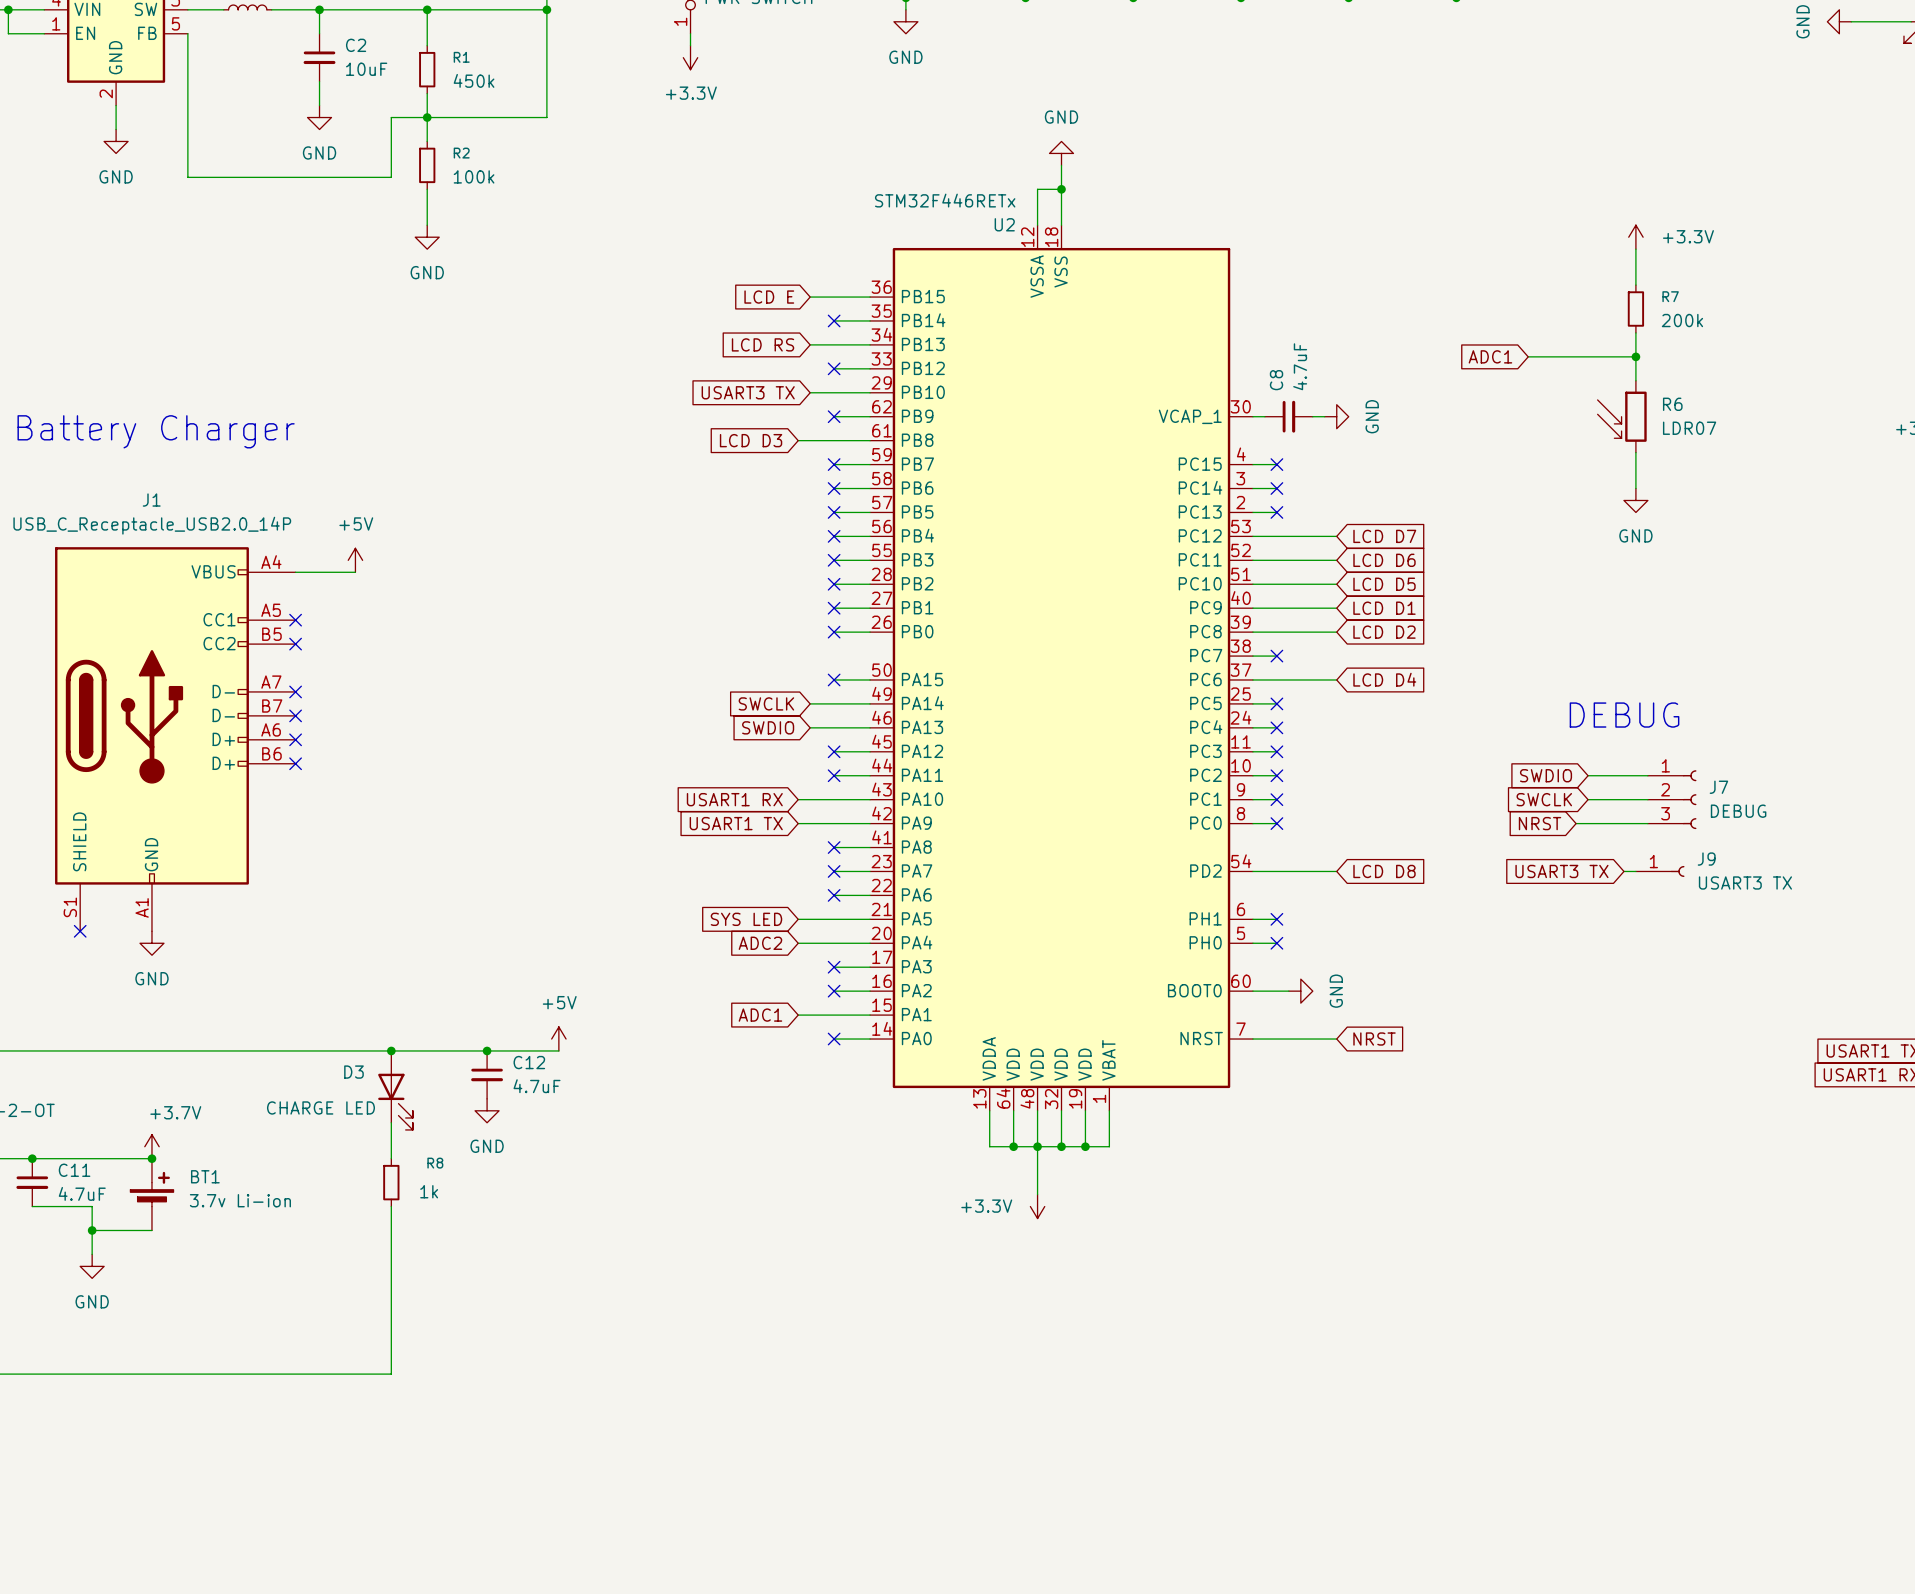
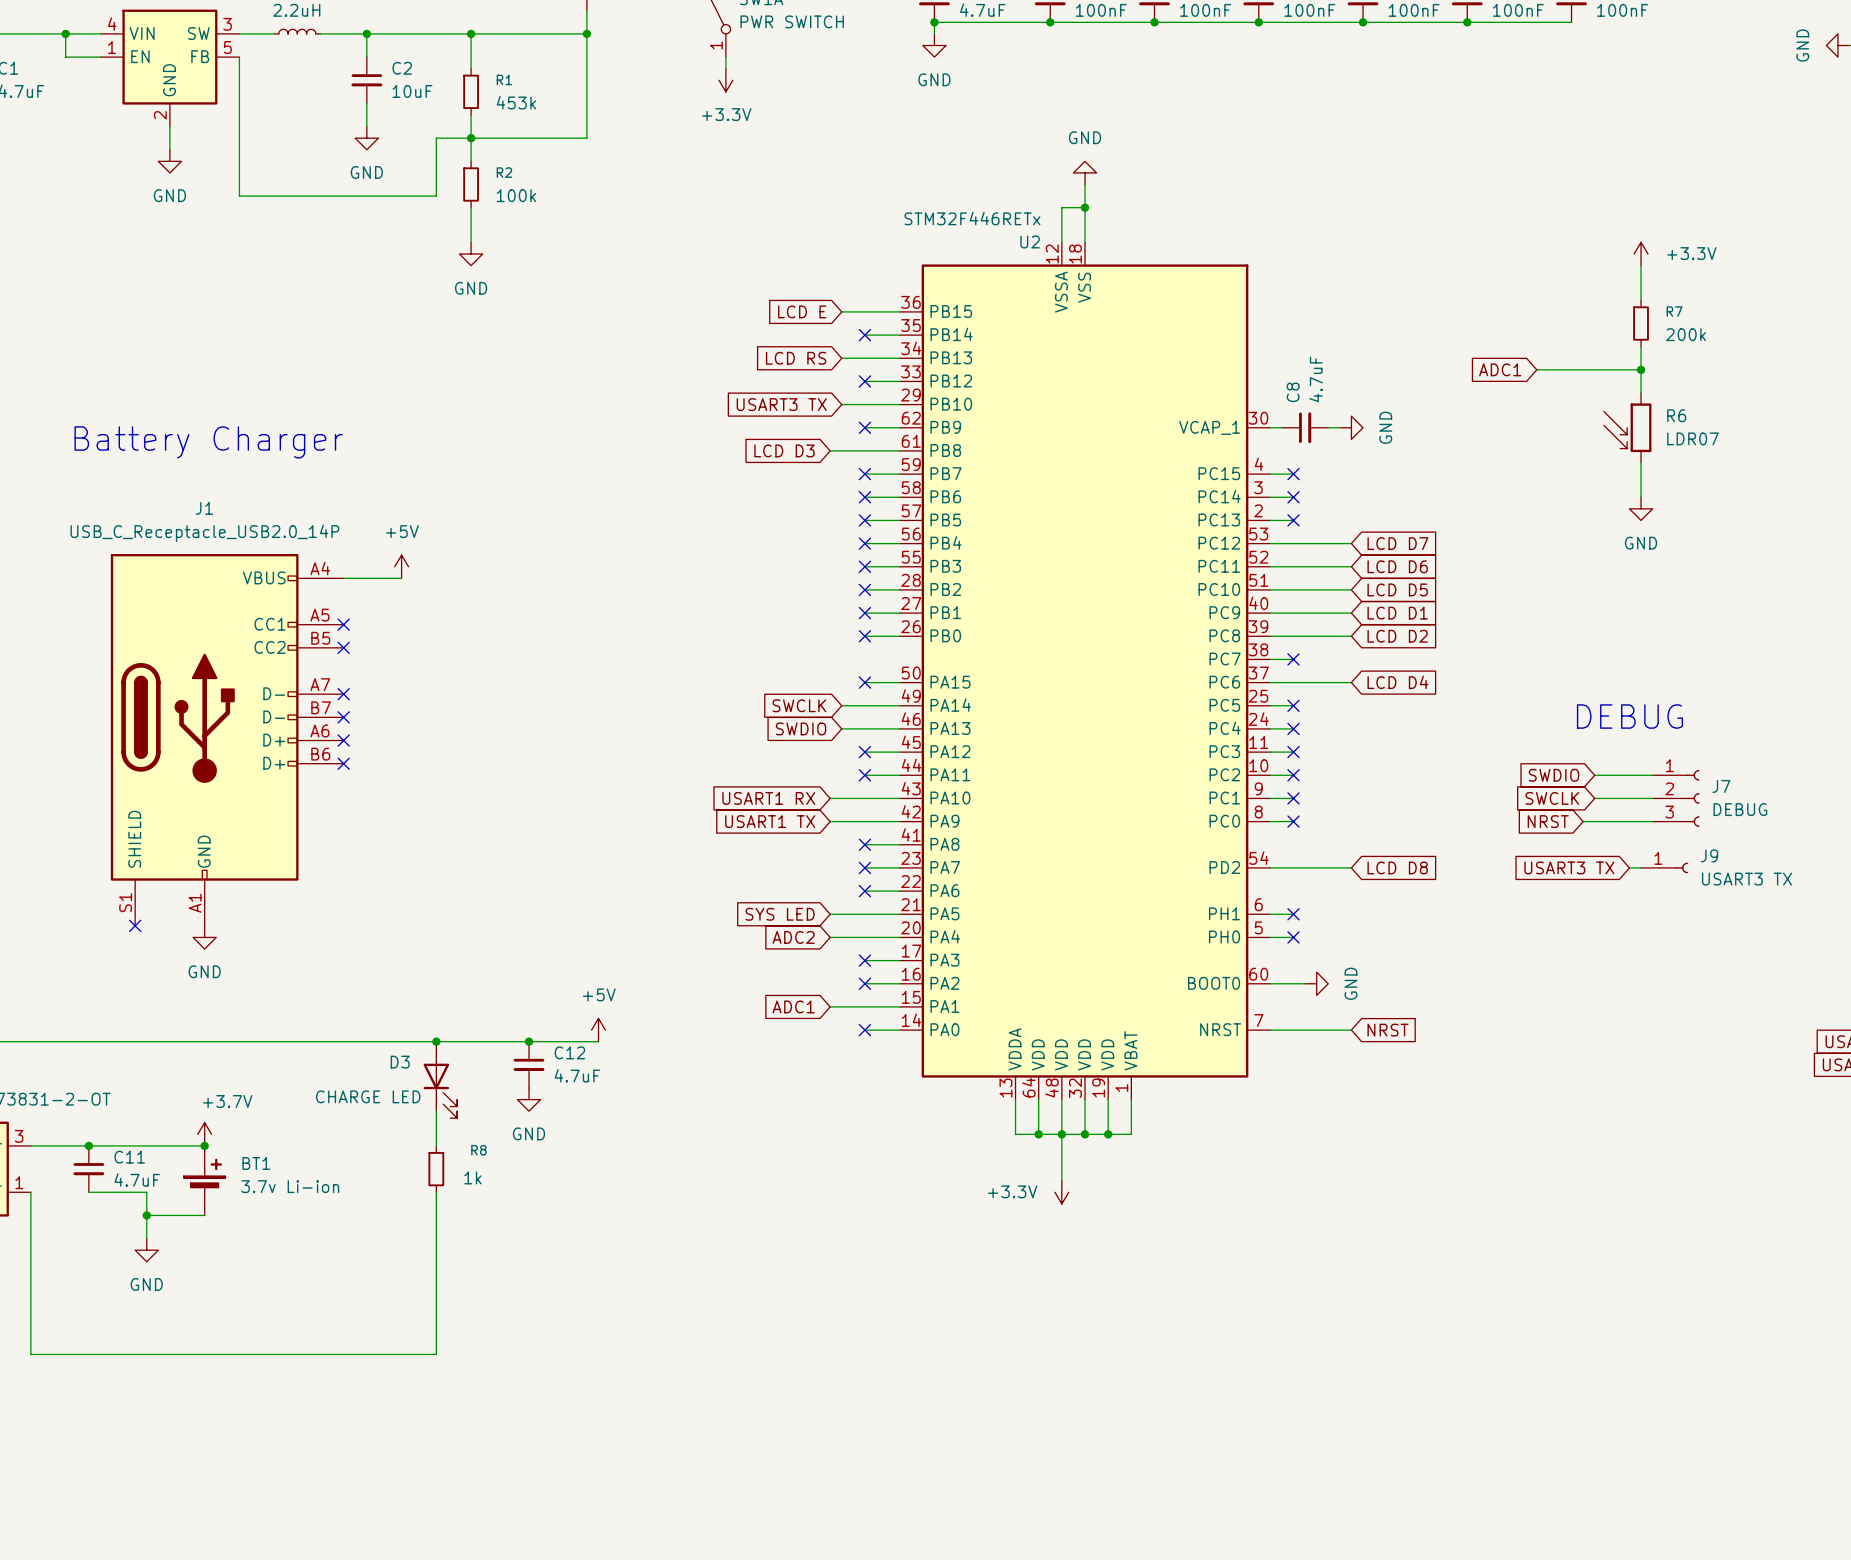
R1 value: 450k (474, 80) -> 453k (516, 102)

